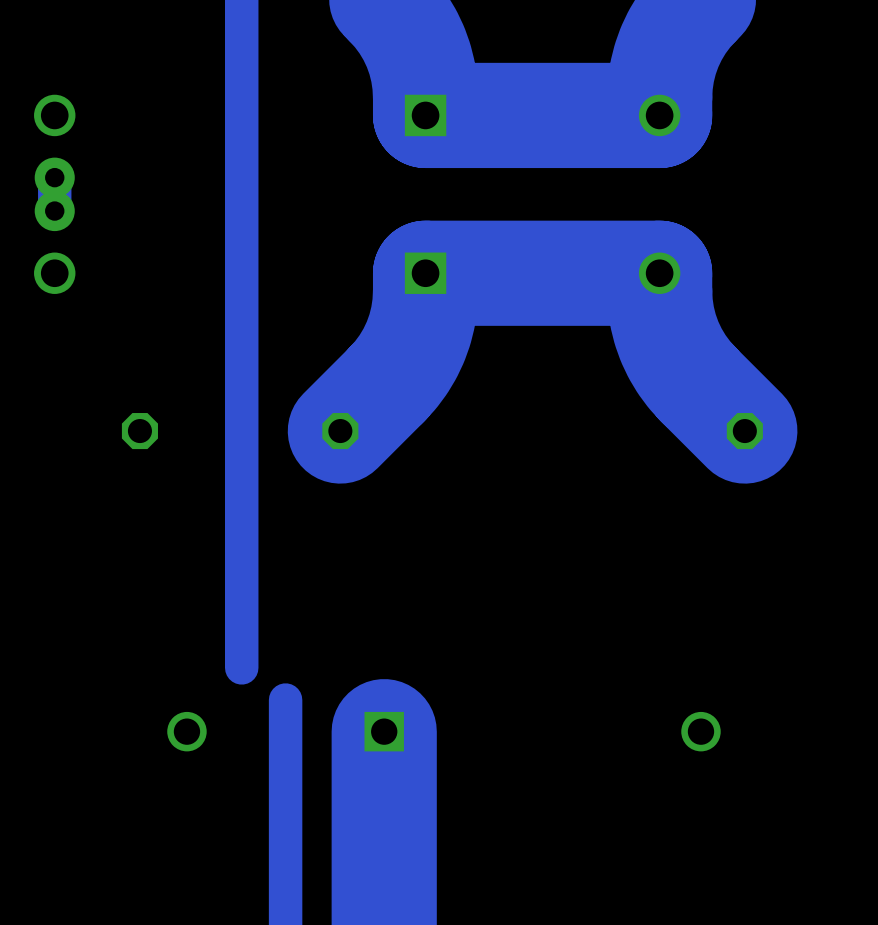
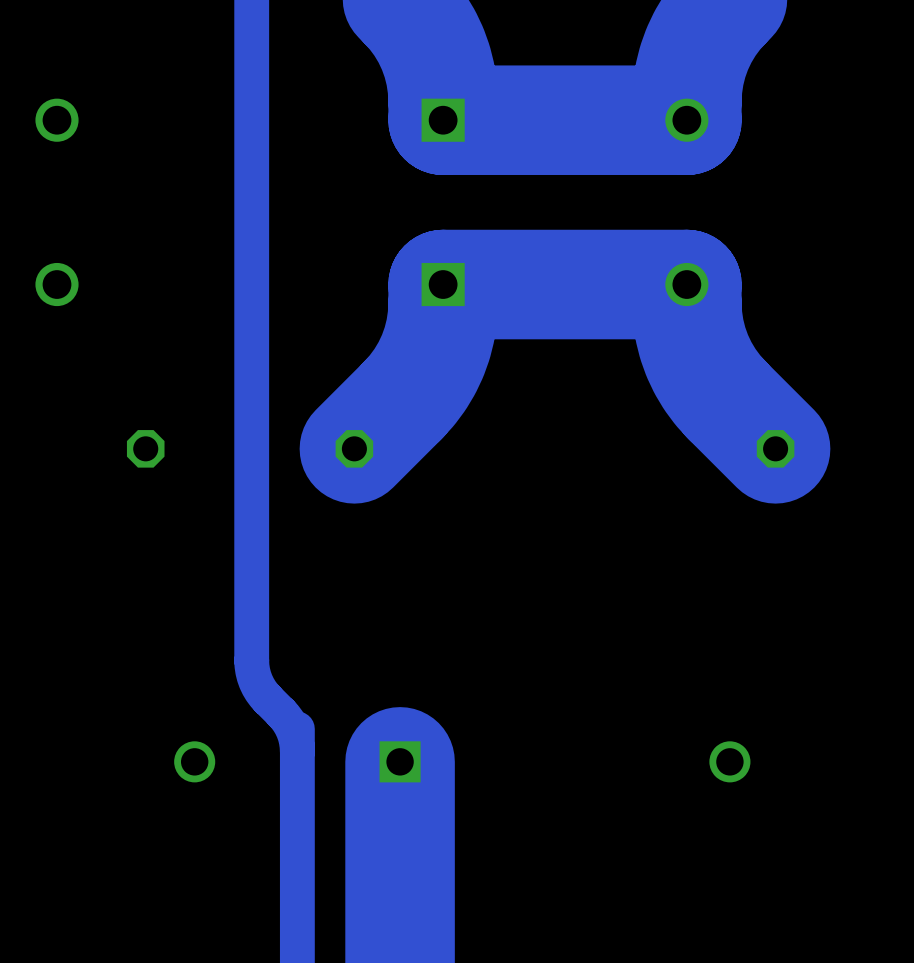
part: (54, 194) -> none
track: (241, 634) (241, 667) -> (251, 660) (254, 676) (260, 691) (290, 725) (296, 740) (297, 751)

